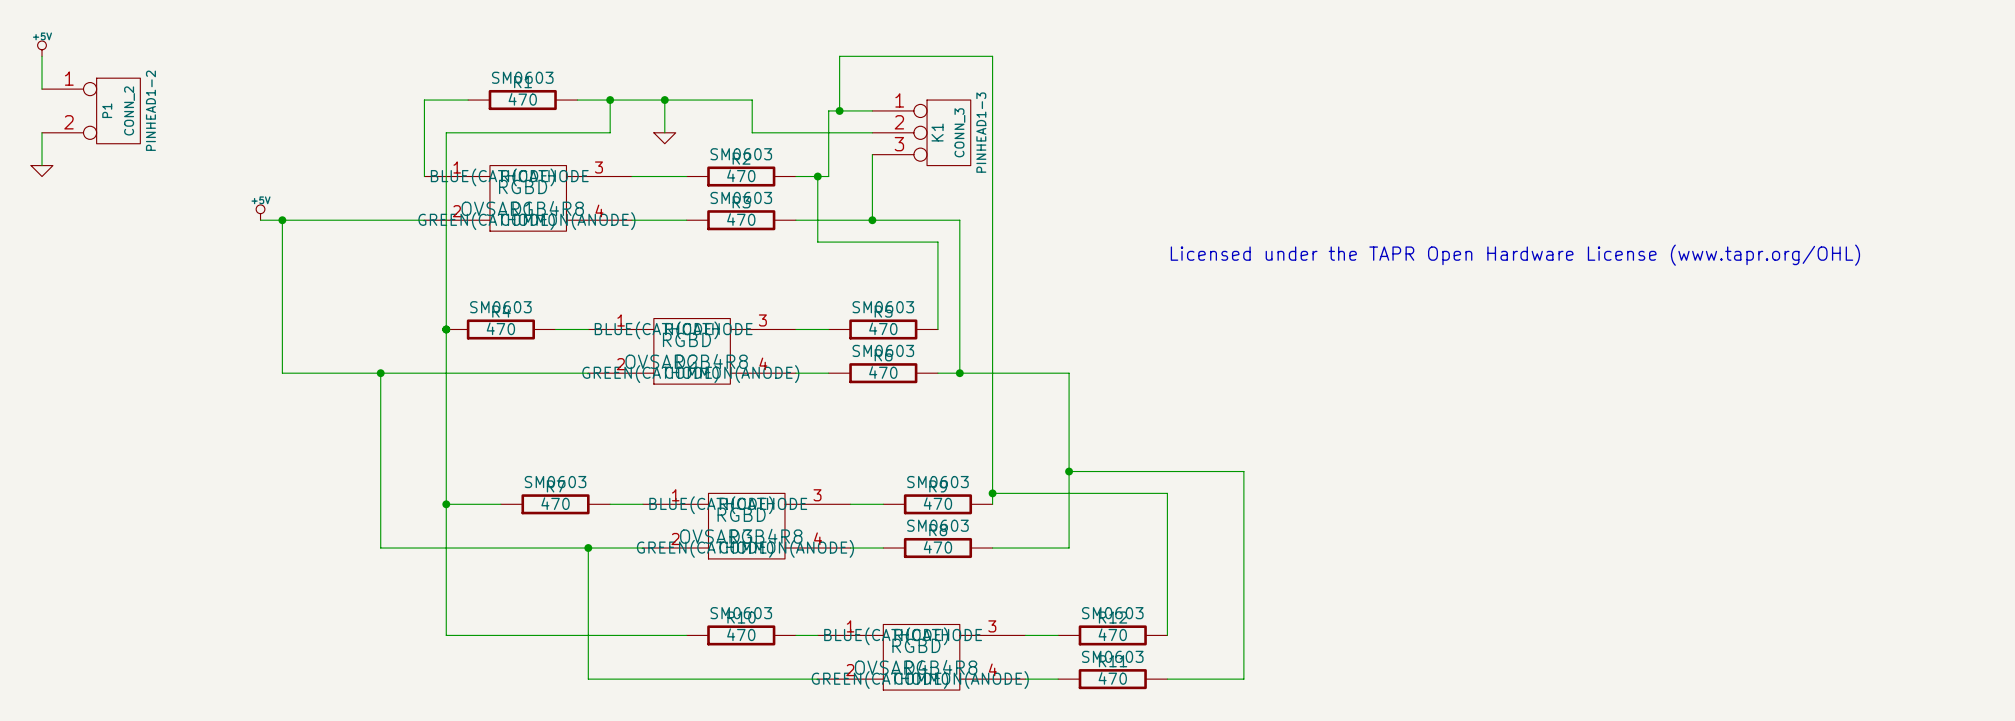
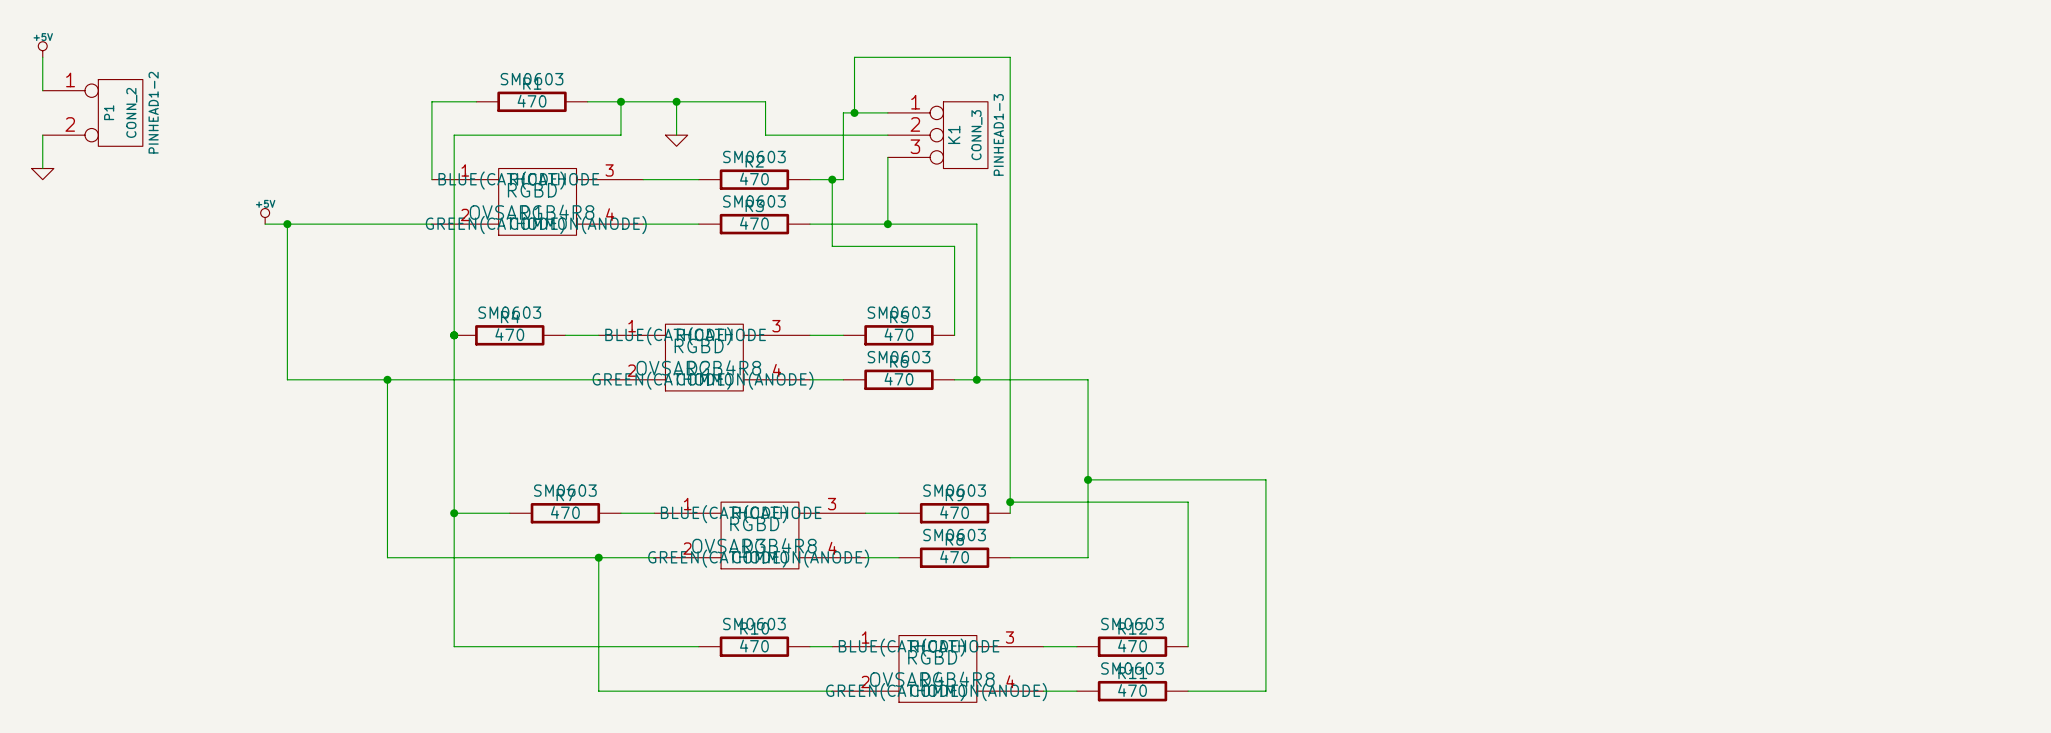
text: Licensed under the TAPR Open Hardware License (www.tapr.org/OHL) (1515, 255) -> none

